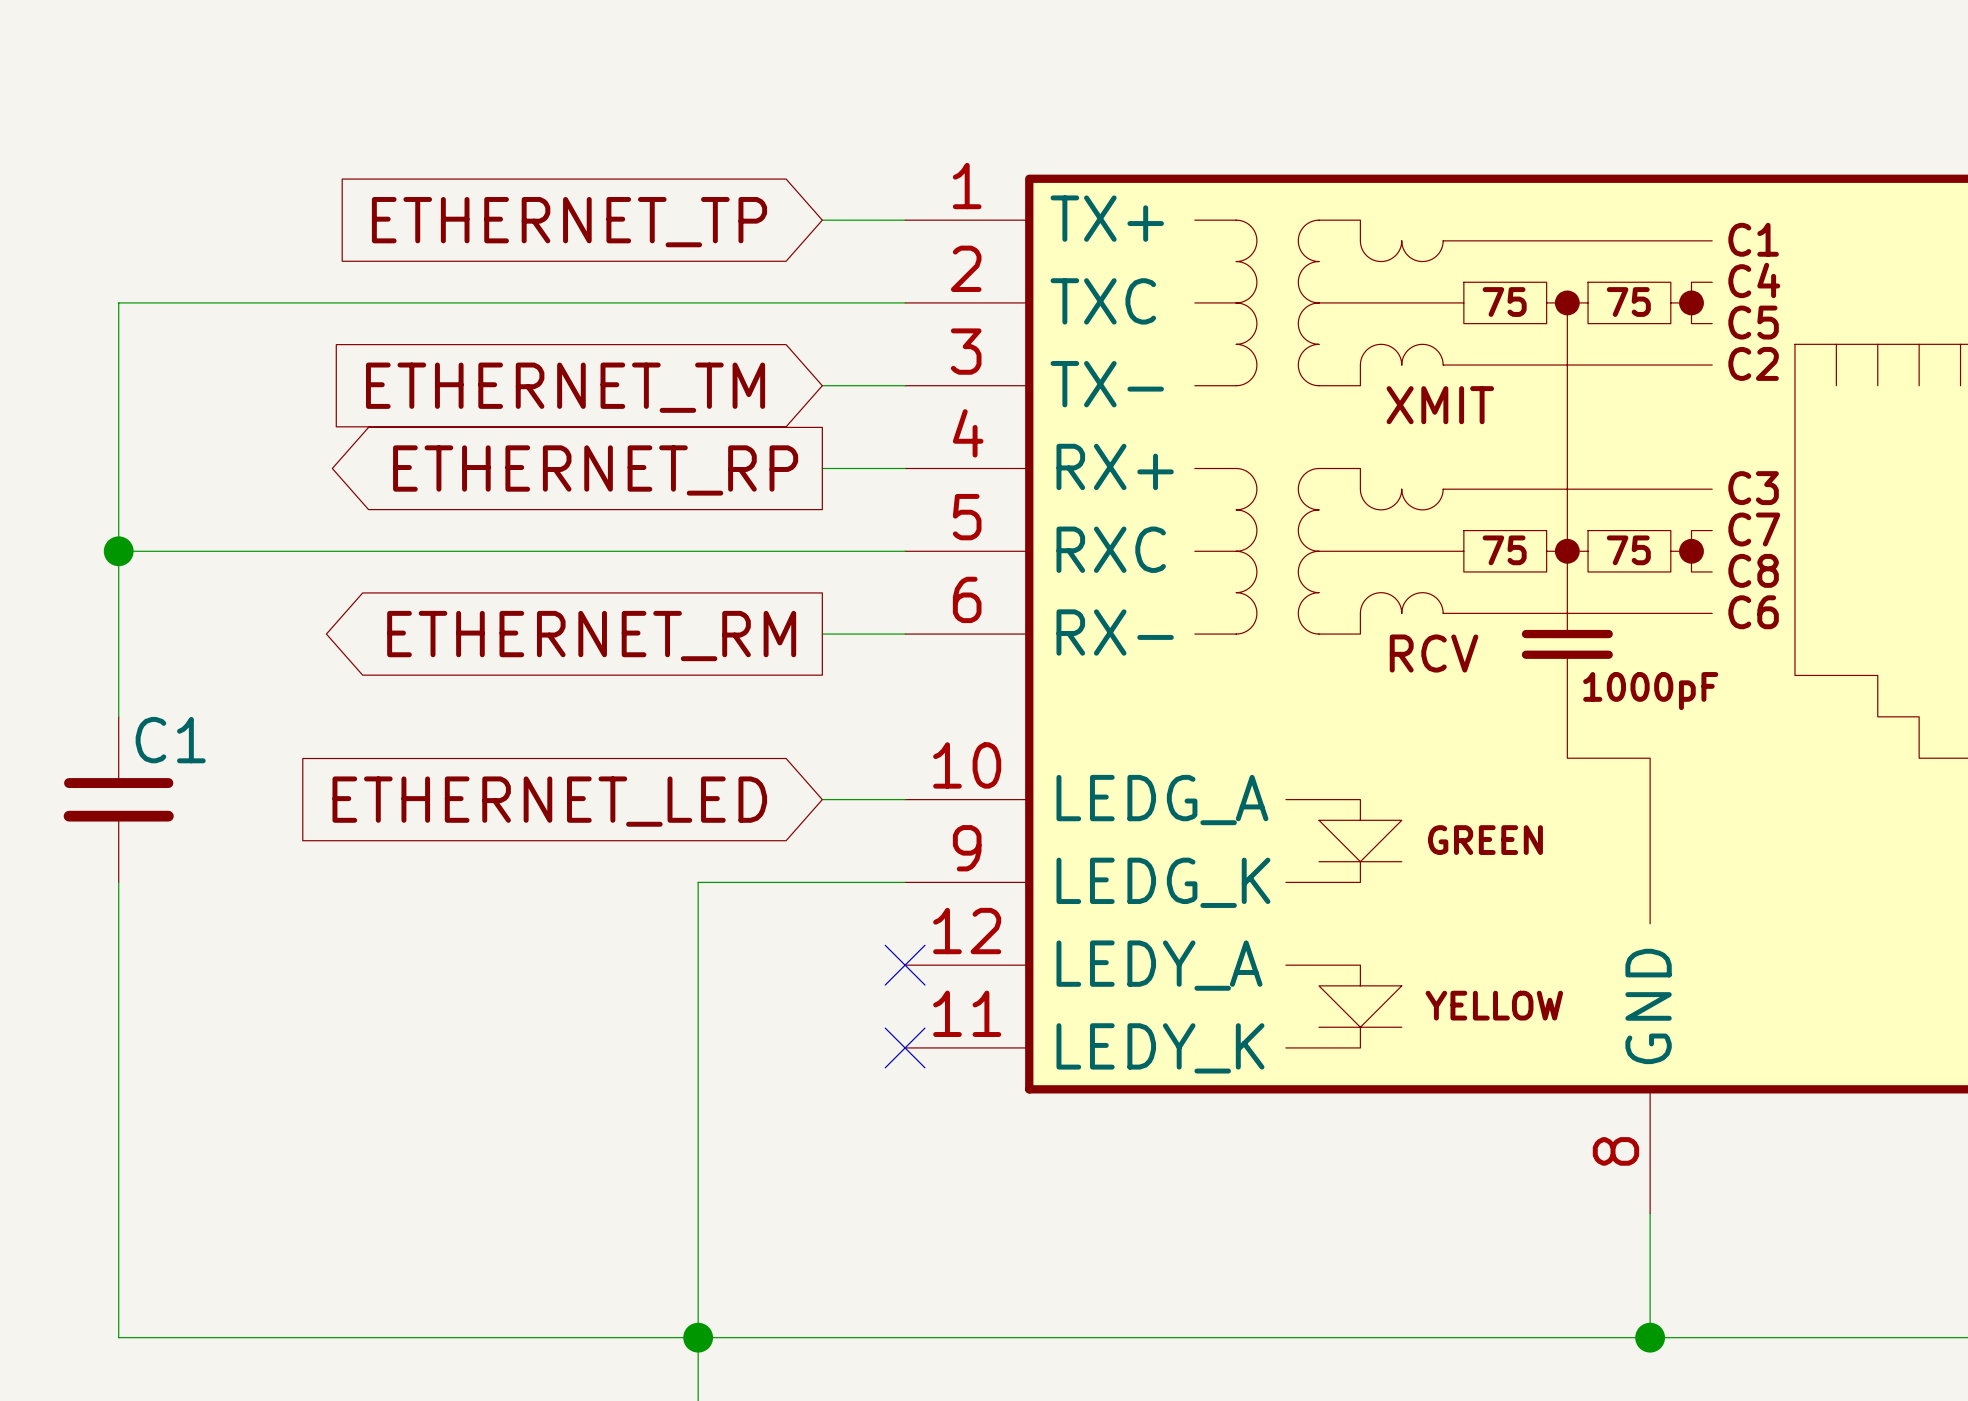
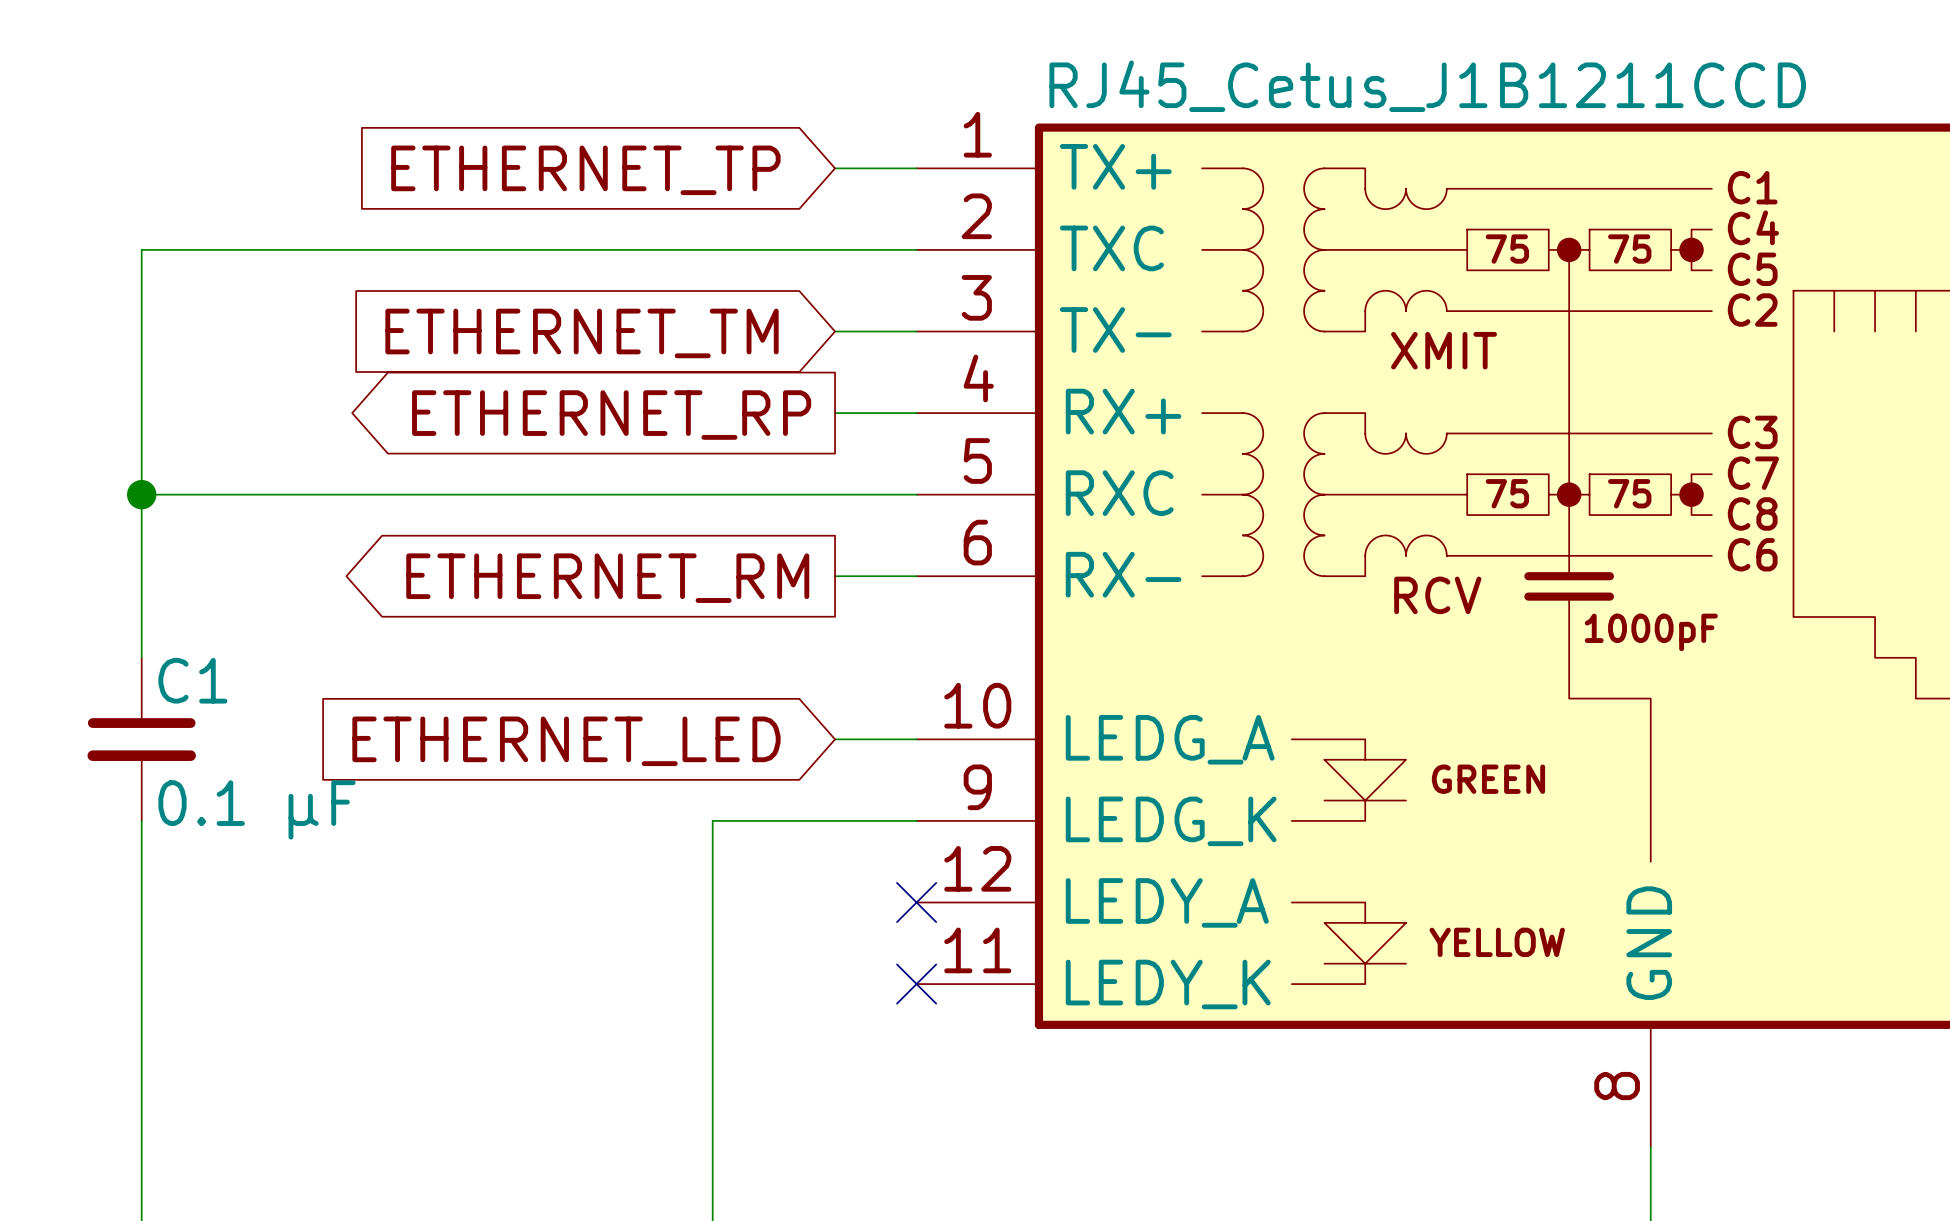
part value: none -> RJ45_Cetus_J1B1211CCD (1427, 86)
C1 value: none -> 0.1 μF (256, 809)

